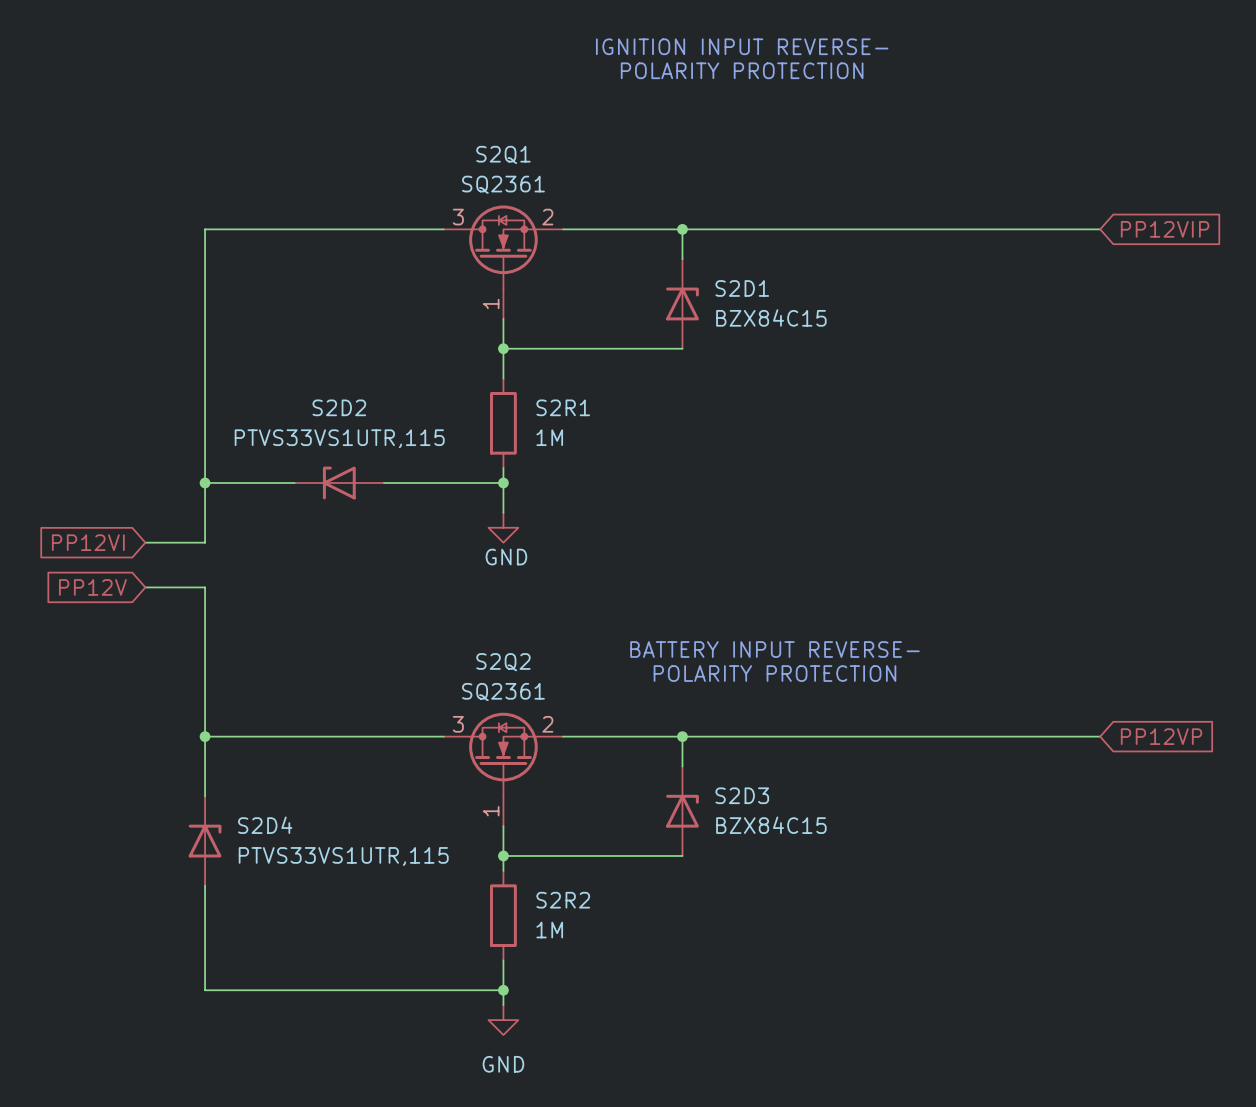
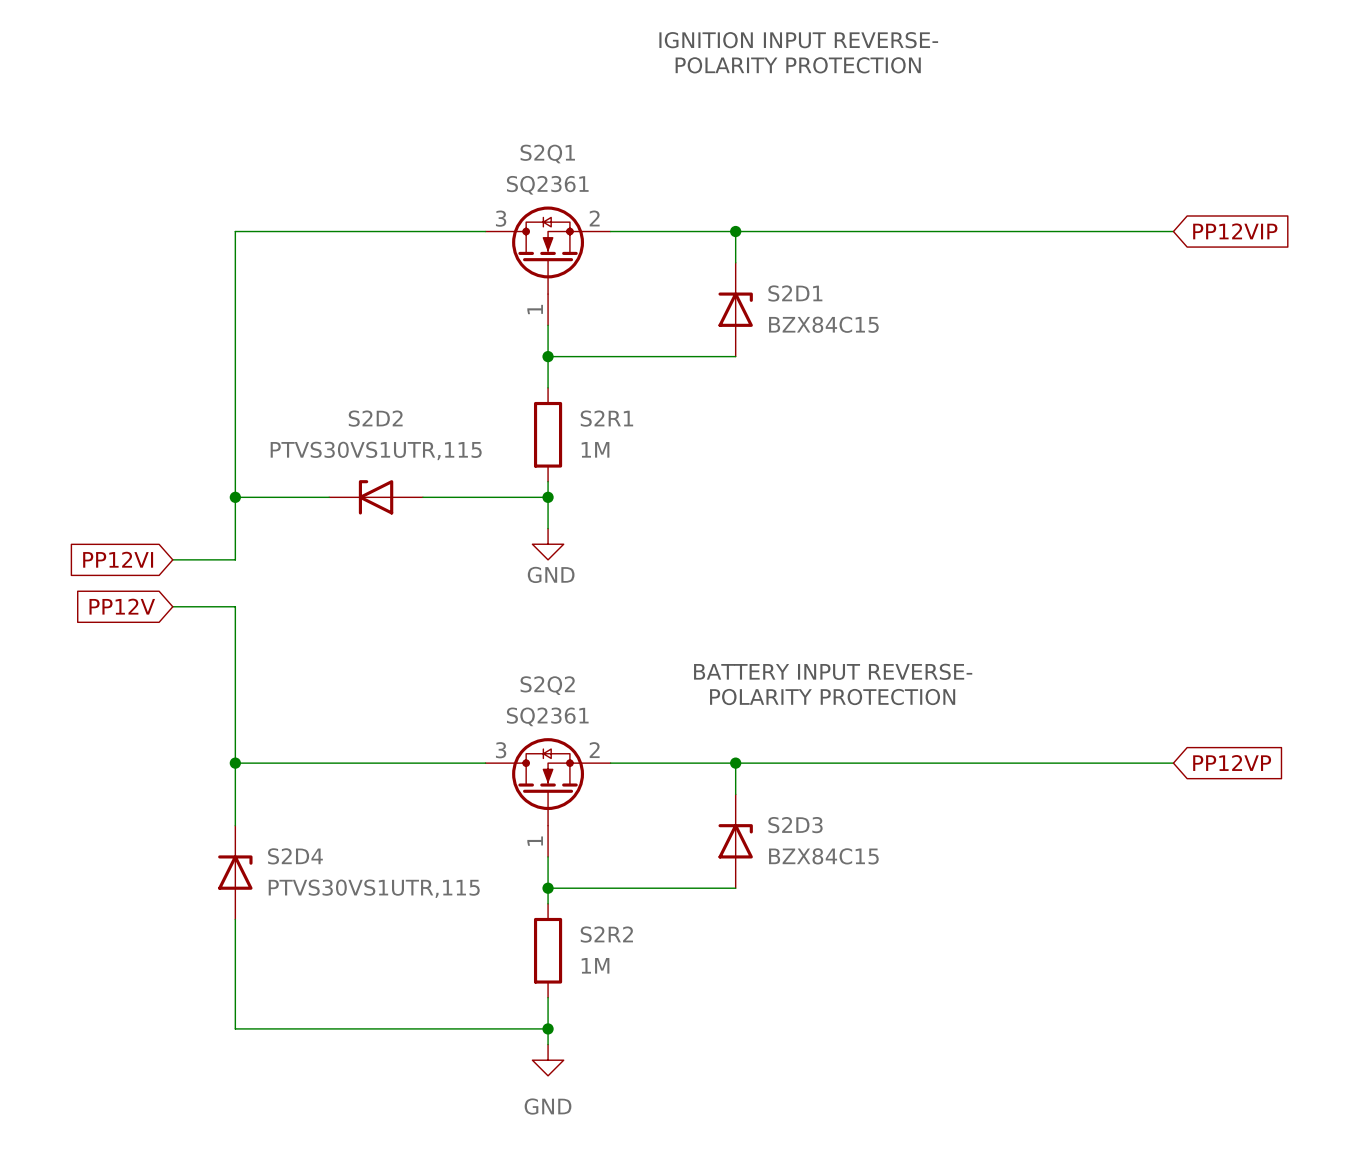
S2D2 value: PTVS33VS1UTR,115 (339, 438) -> PTVS30VS1UTR,115 (376, 450)
S2D4 value: PTVS33VS1UTR,115 (343, 856) -> PTVS30VS1UTR,115 (374, 888)

